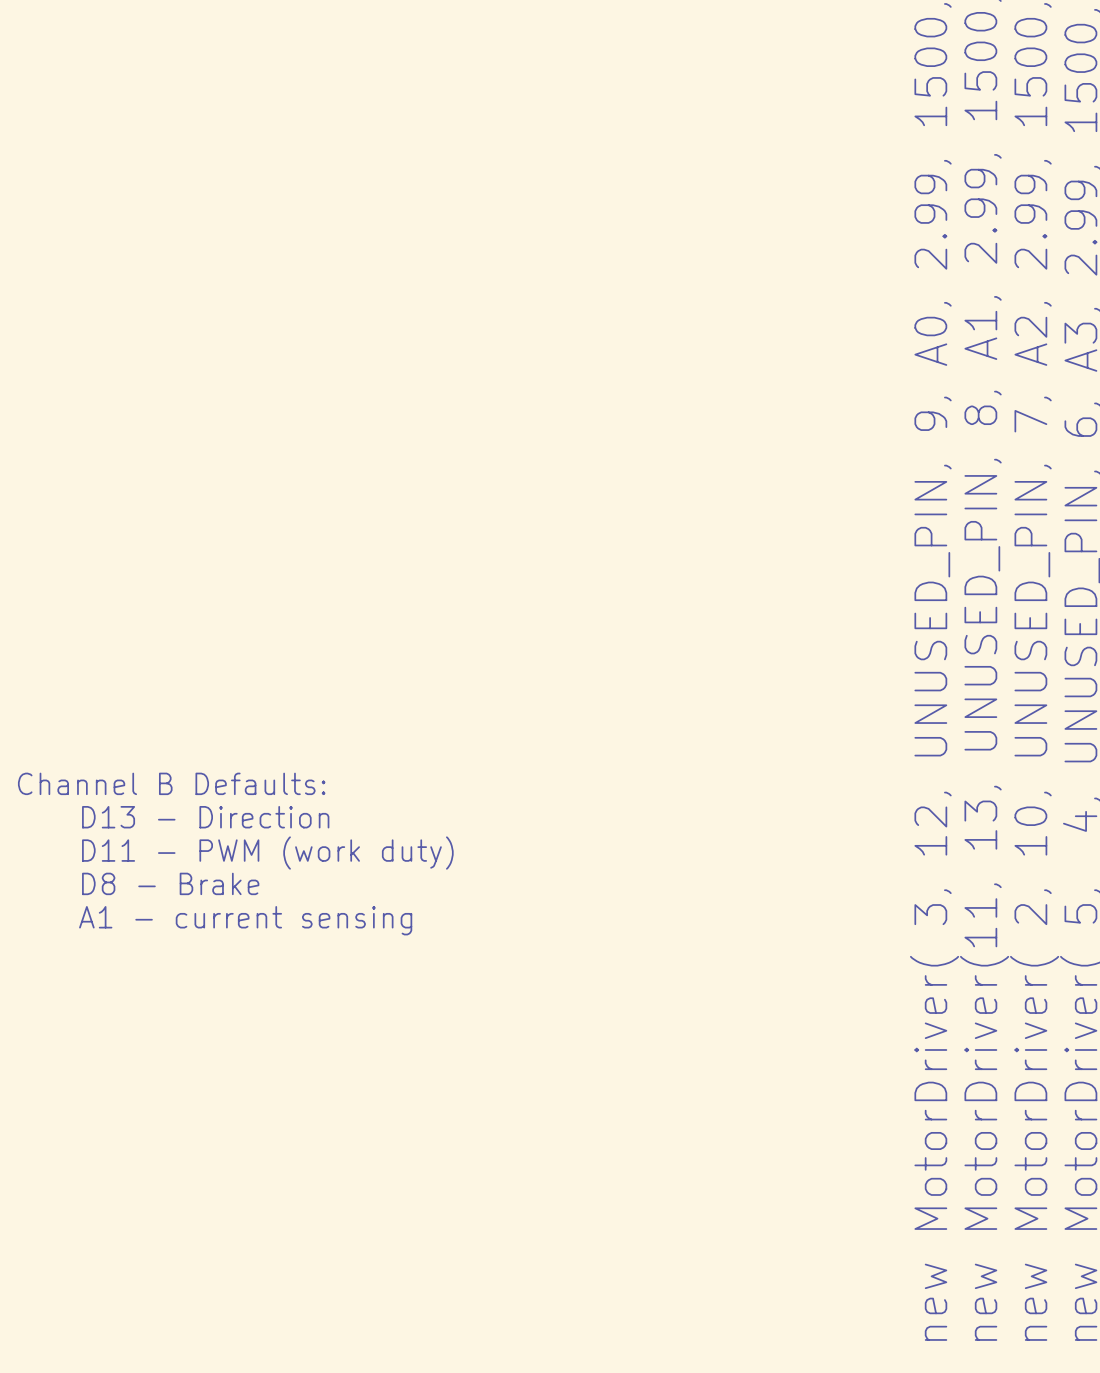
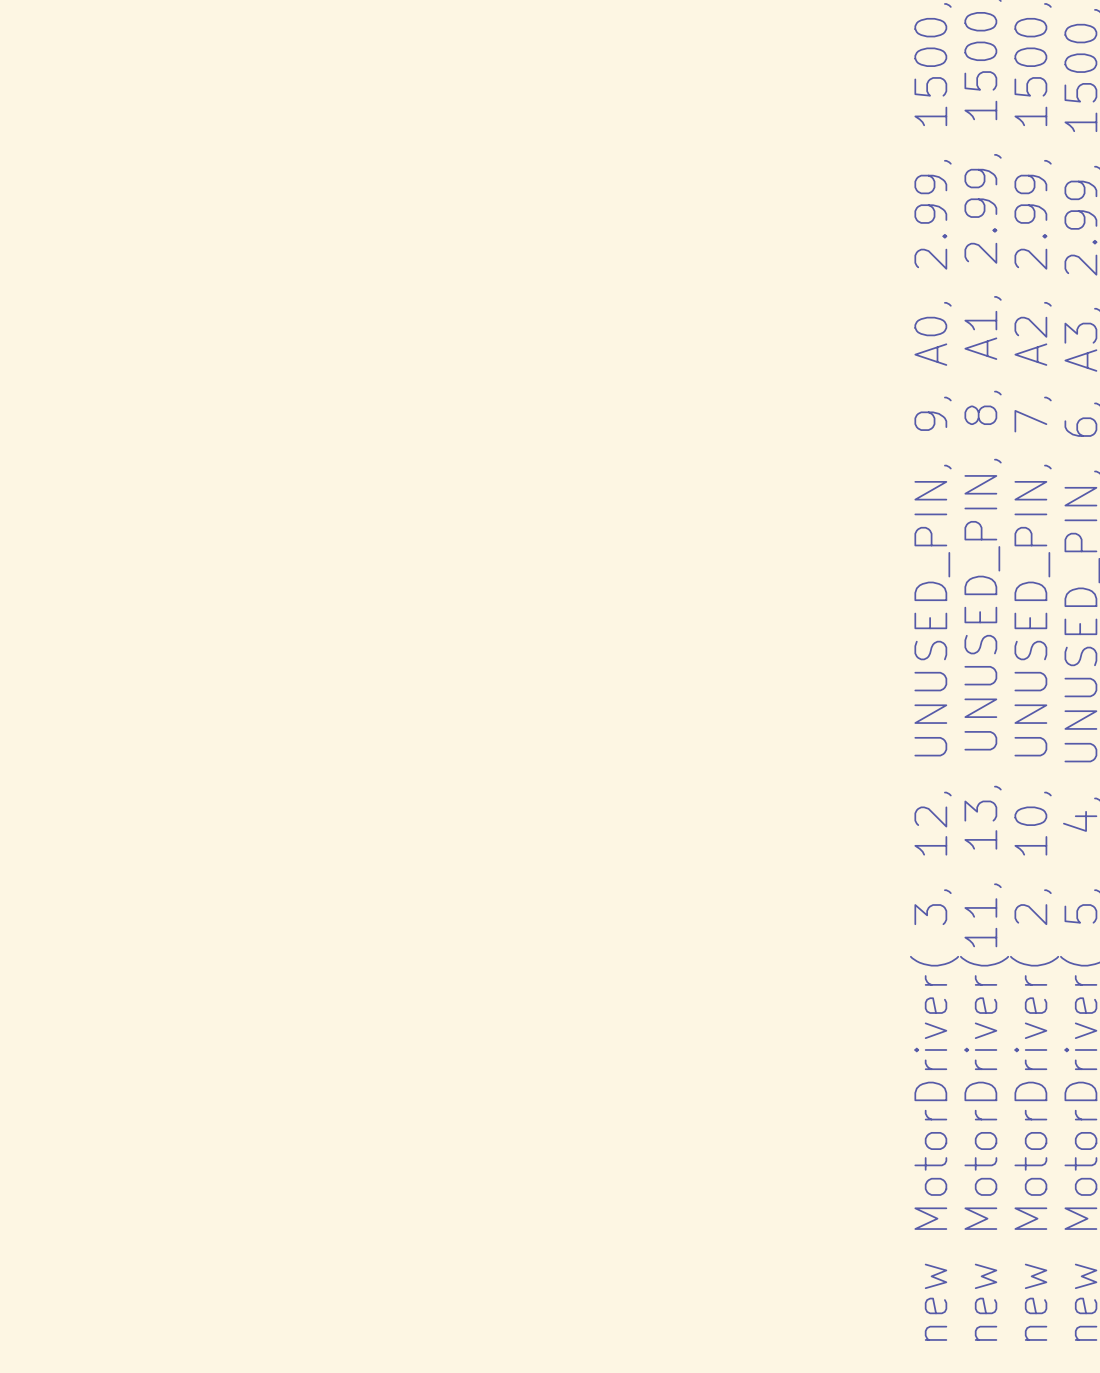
text: Channel B Defaults: (171, 783) -> none
text: D13 - Direction (205, 817) -> none
text: D11 - PWM (work duty) (267, 853) -> none
text: D8 - Brake (170, 883) -> none
text: A1 - current sensing (245, 920) -> none

